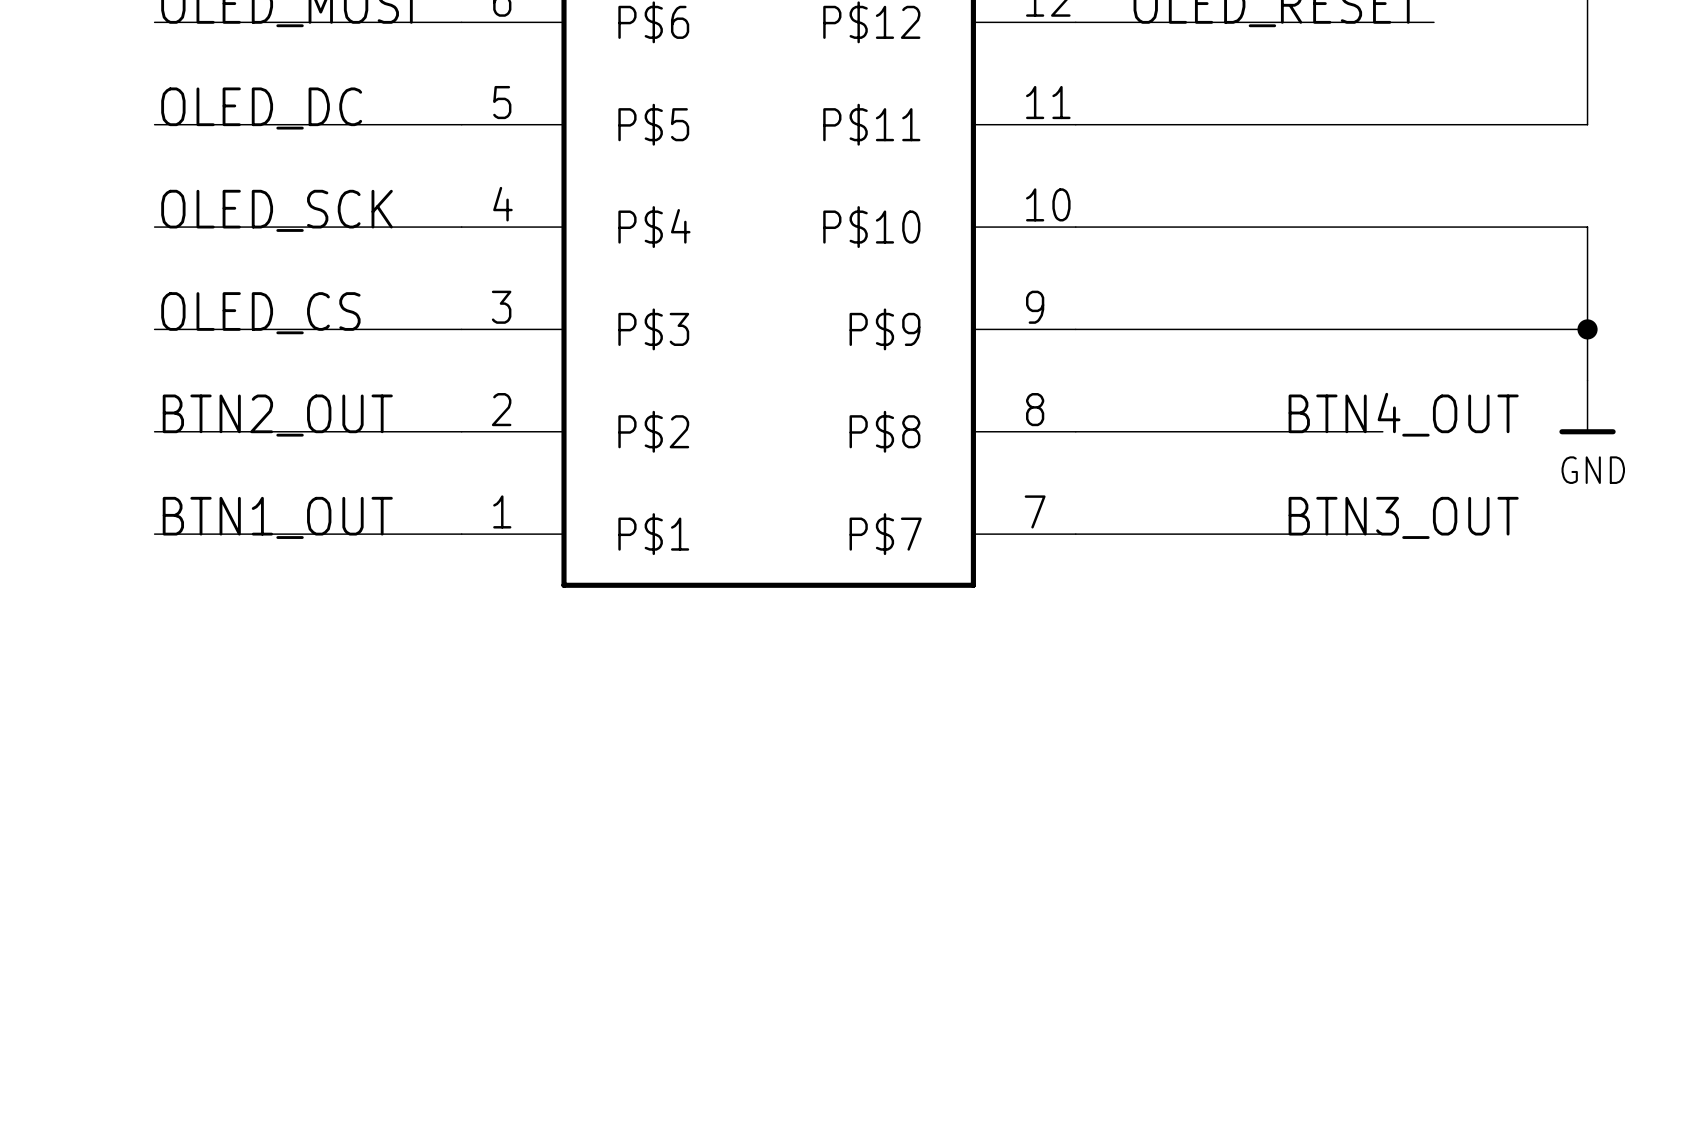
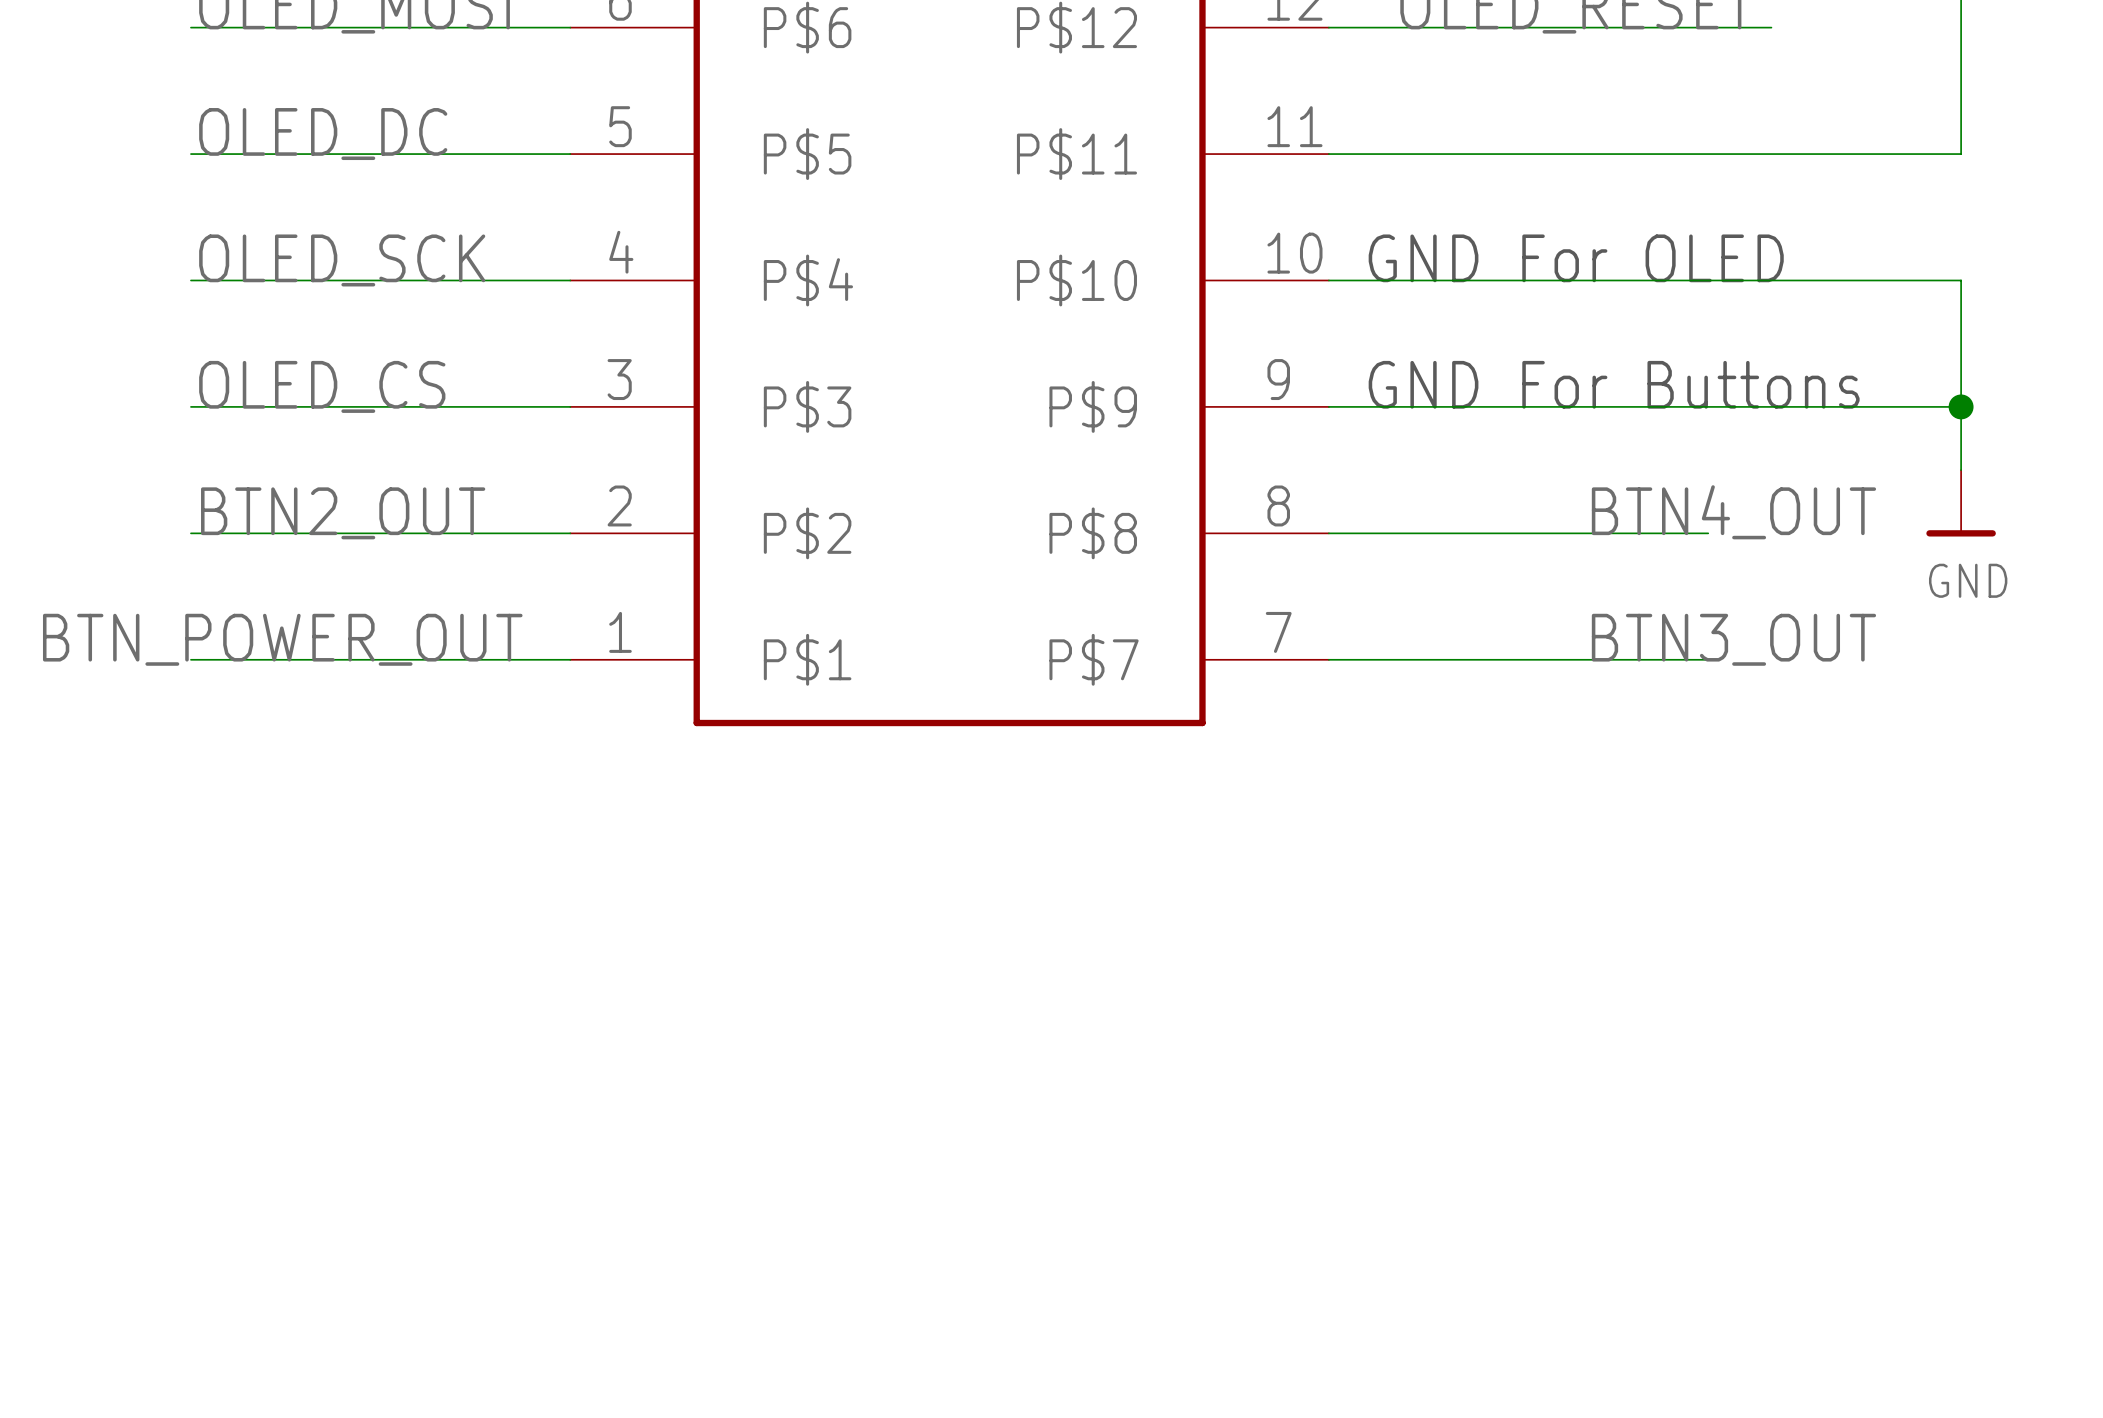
text: none -> GND For OLED (1576, 258)
text: none -> GND For Buttons (1614, 384)
label: BTN1_OUT (277, 517) -> BTN_POWER_OUT (282, 639)

